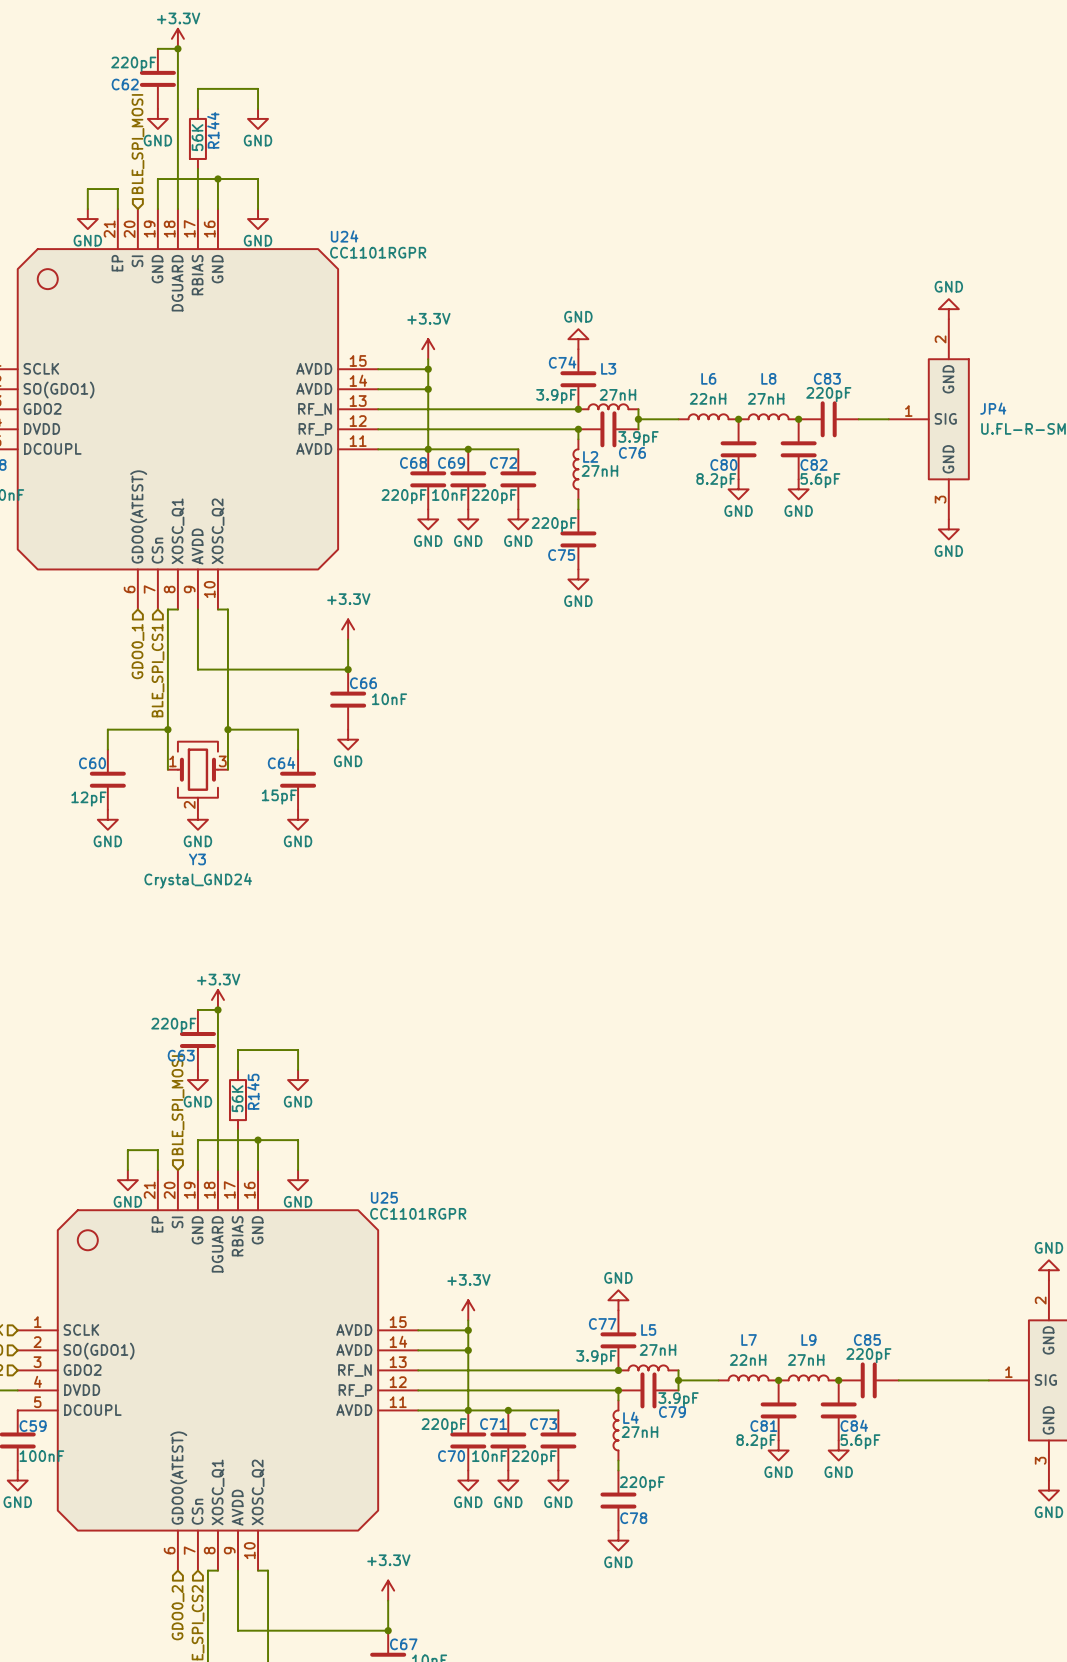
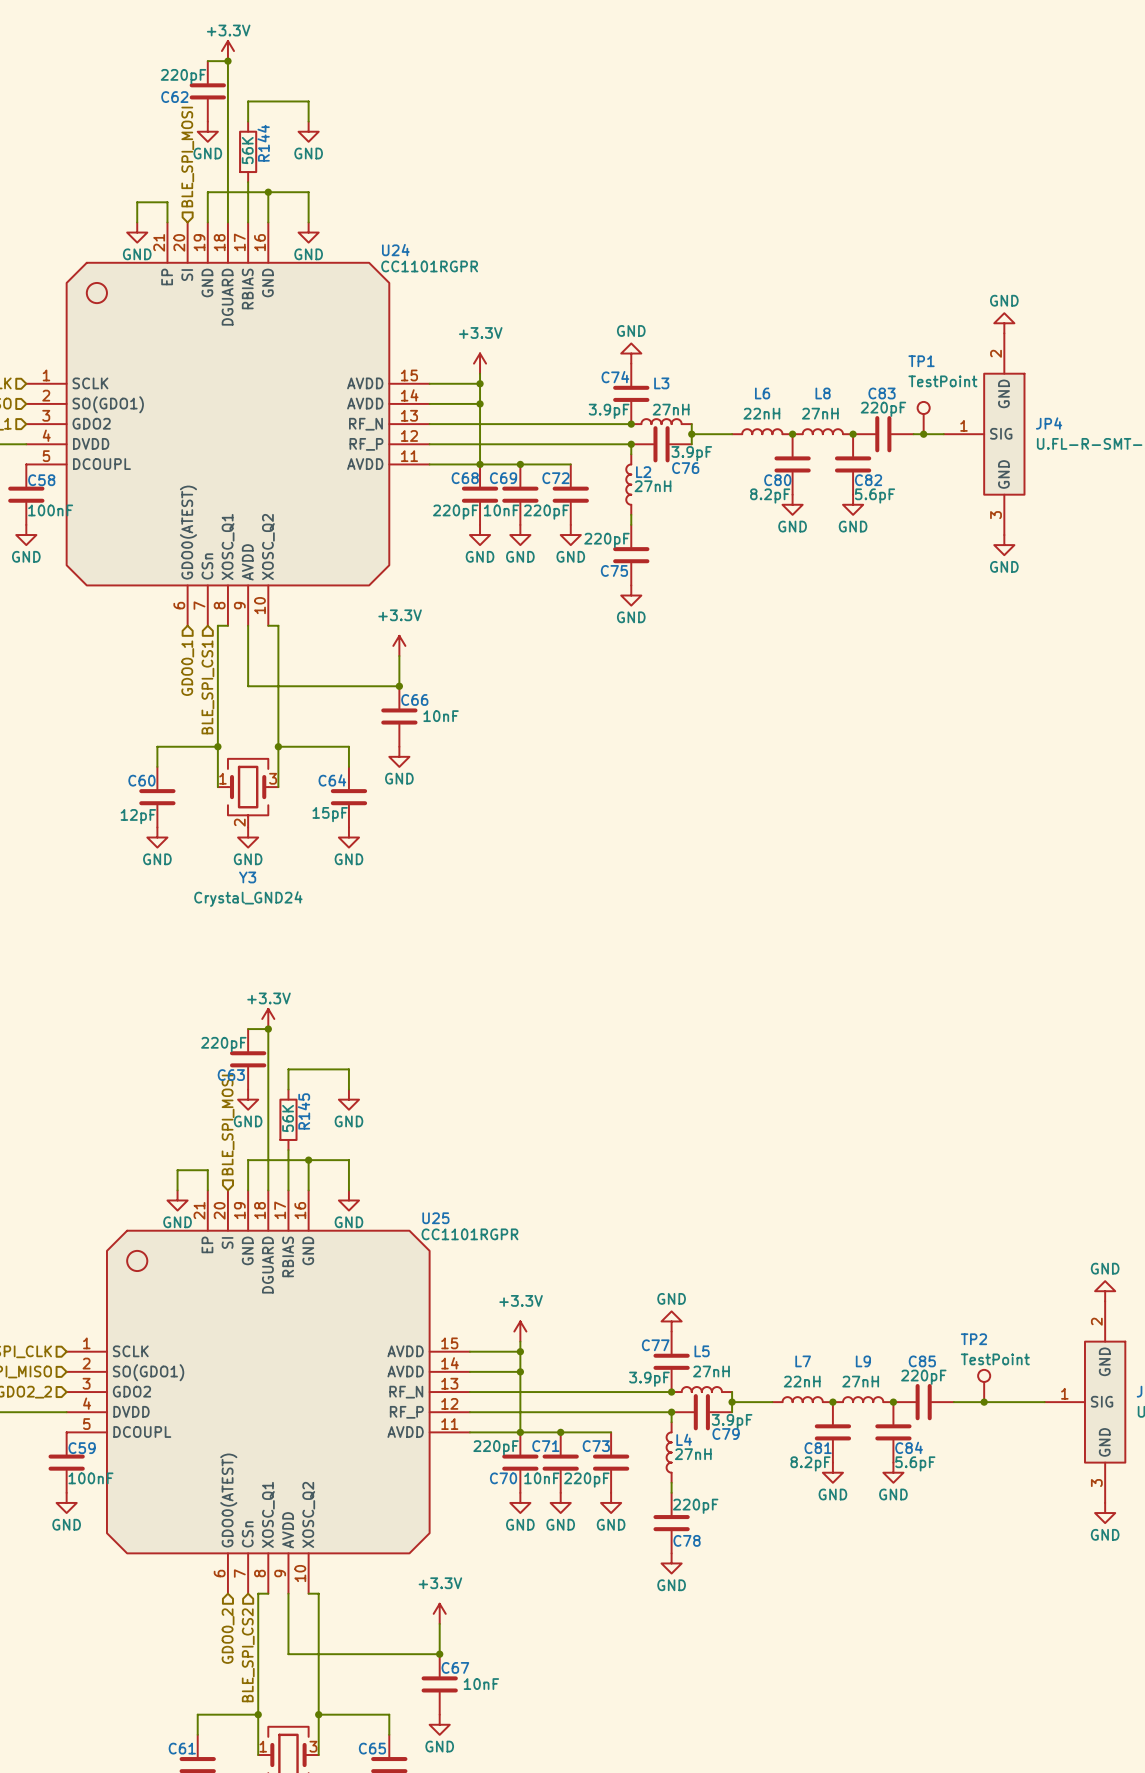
TP1: none -> TestPoint (923, 418)
junction: none -> (923, 434)
TP2: none -> TestPoint (984, 1385)
junction: none -> (984, 1402)

